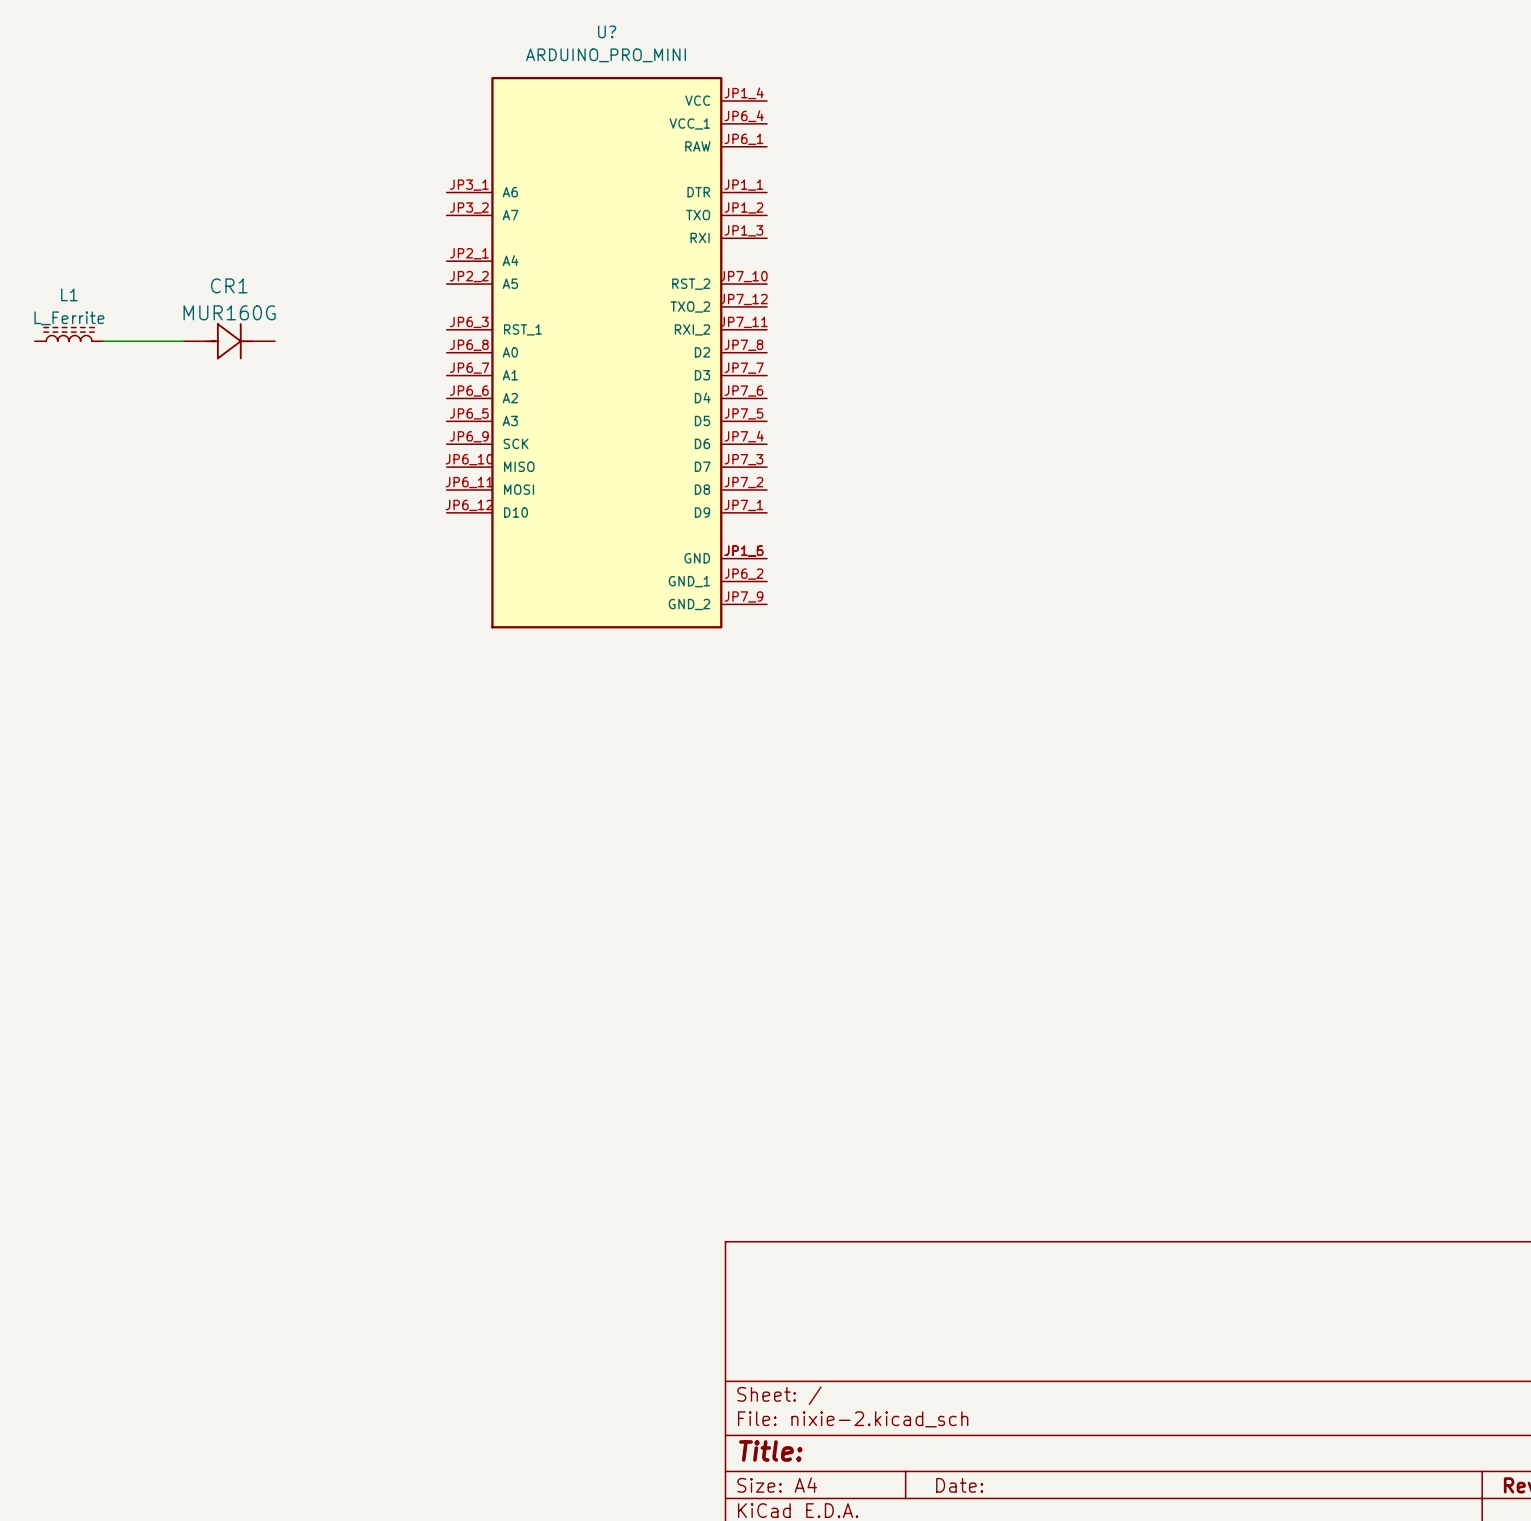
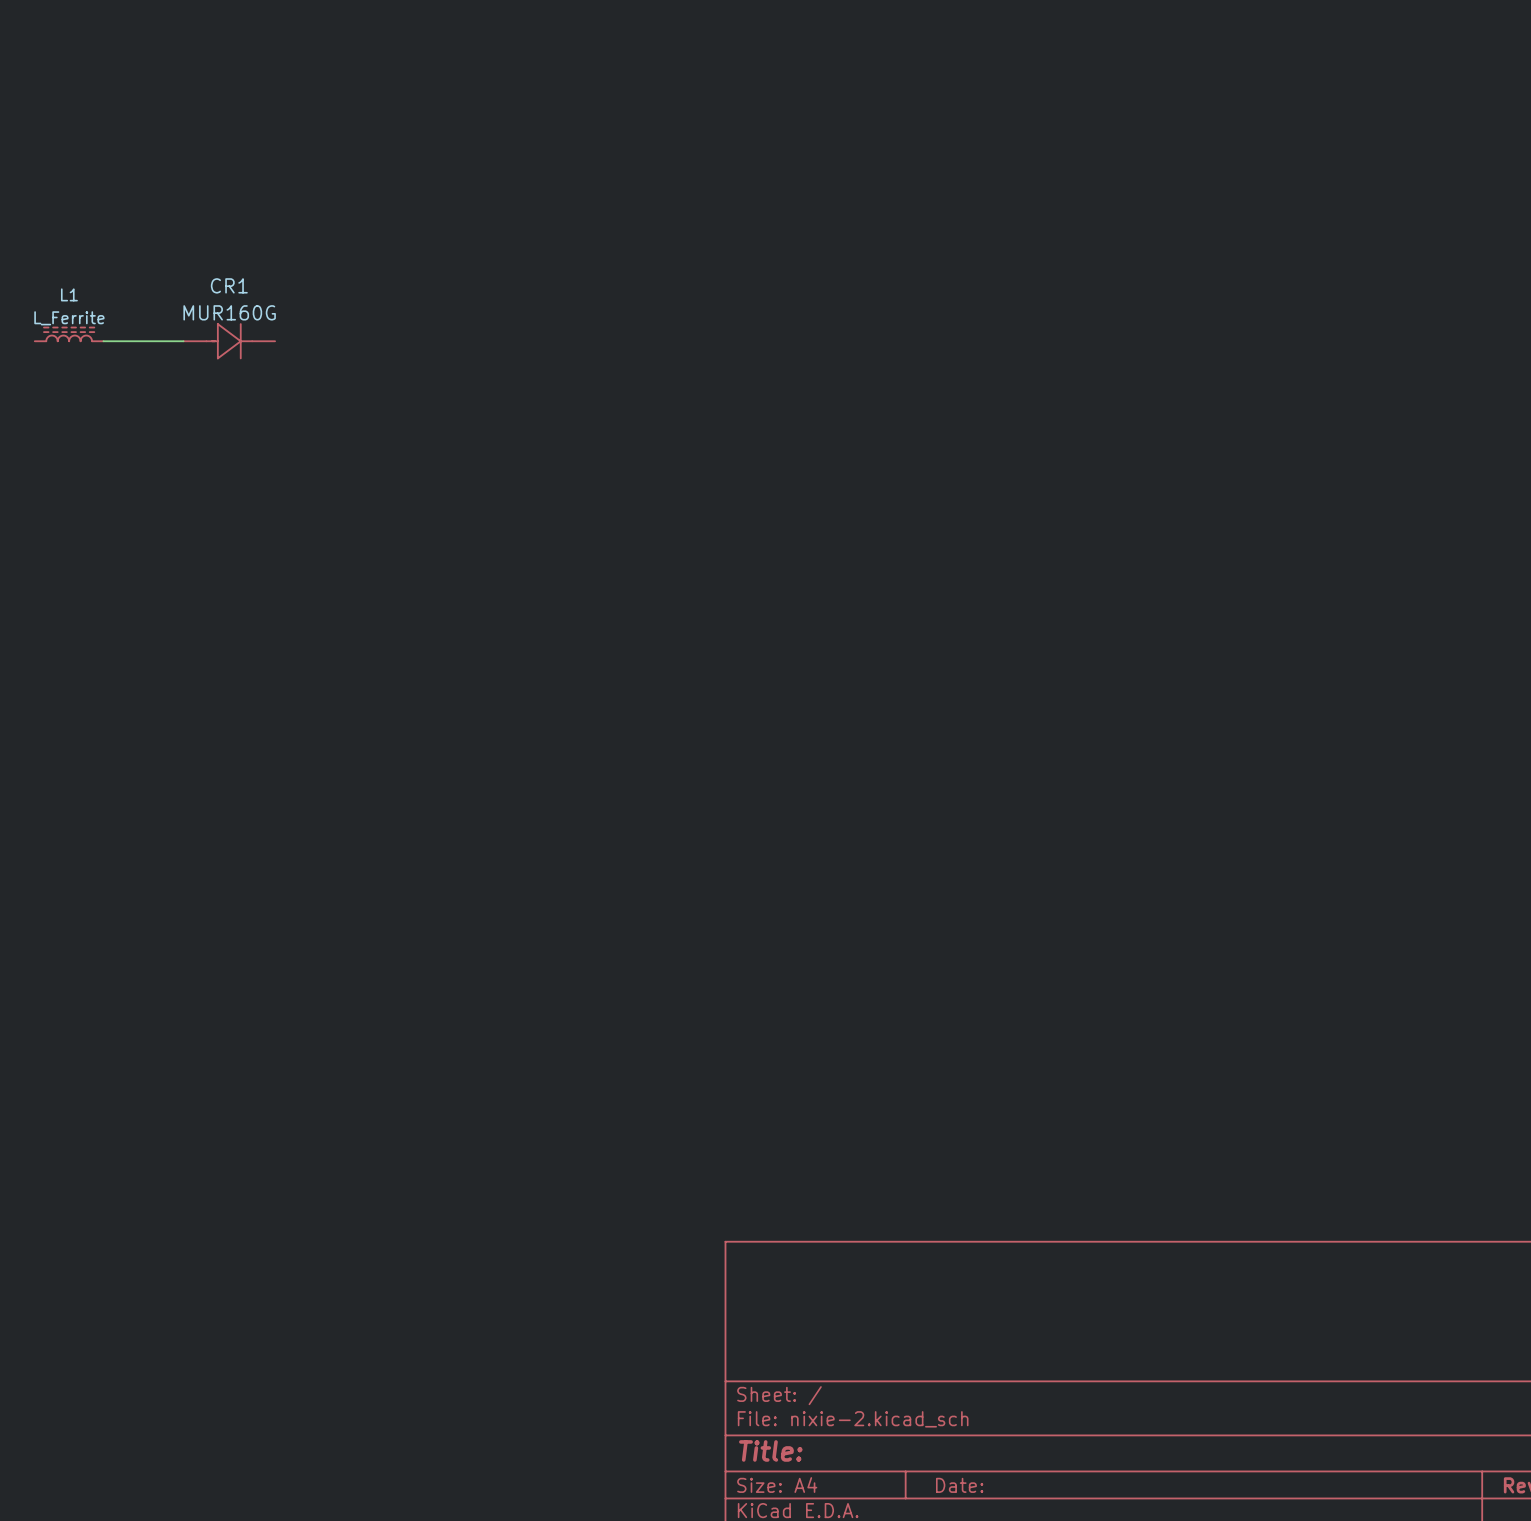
U?: ARDUINO_PRO_MINI (606, 352) -> none

